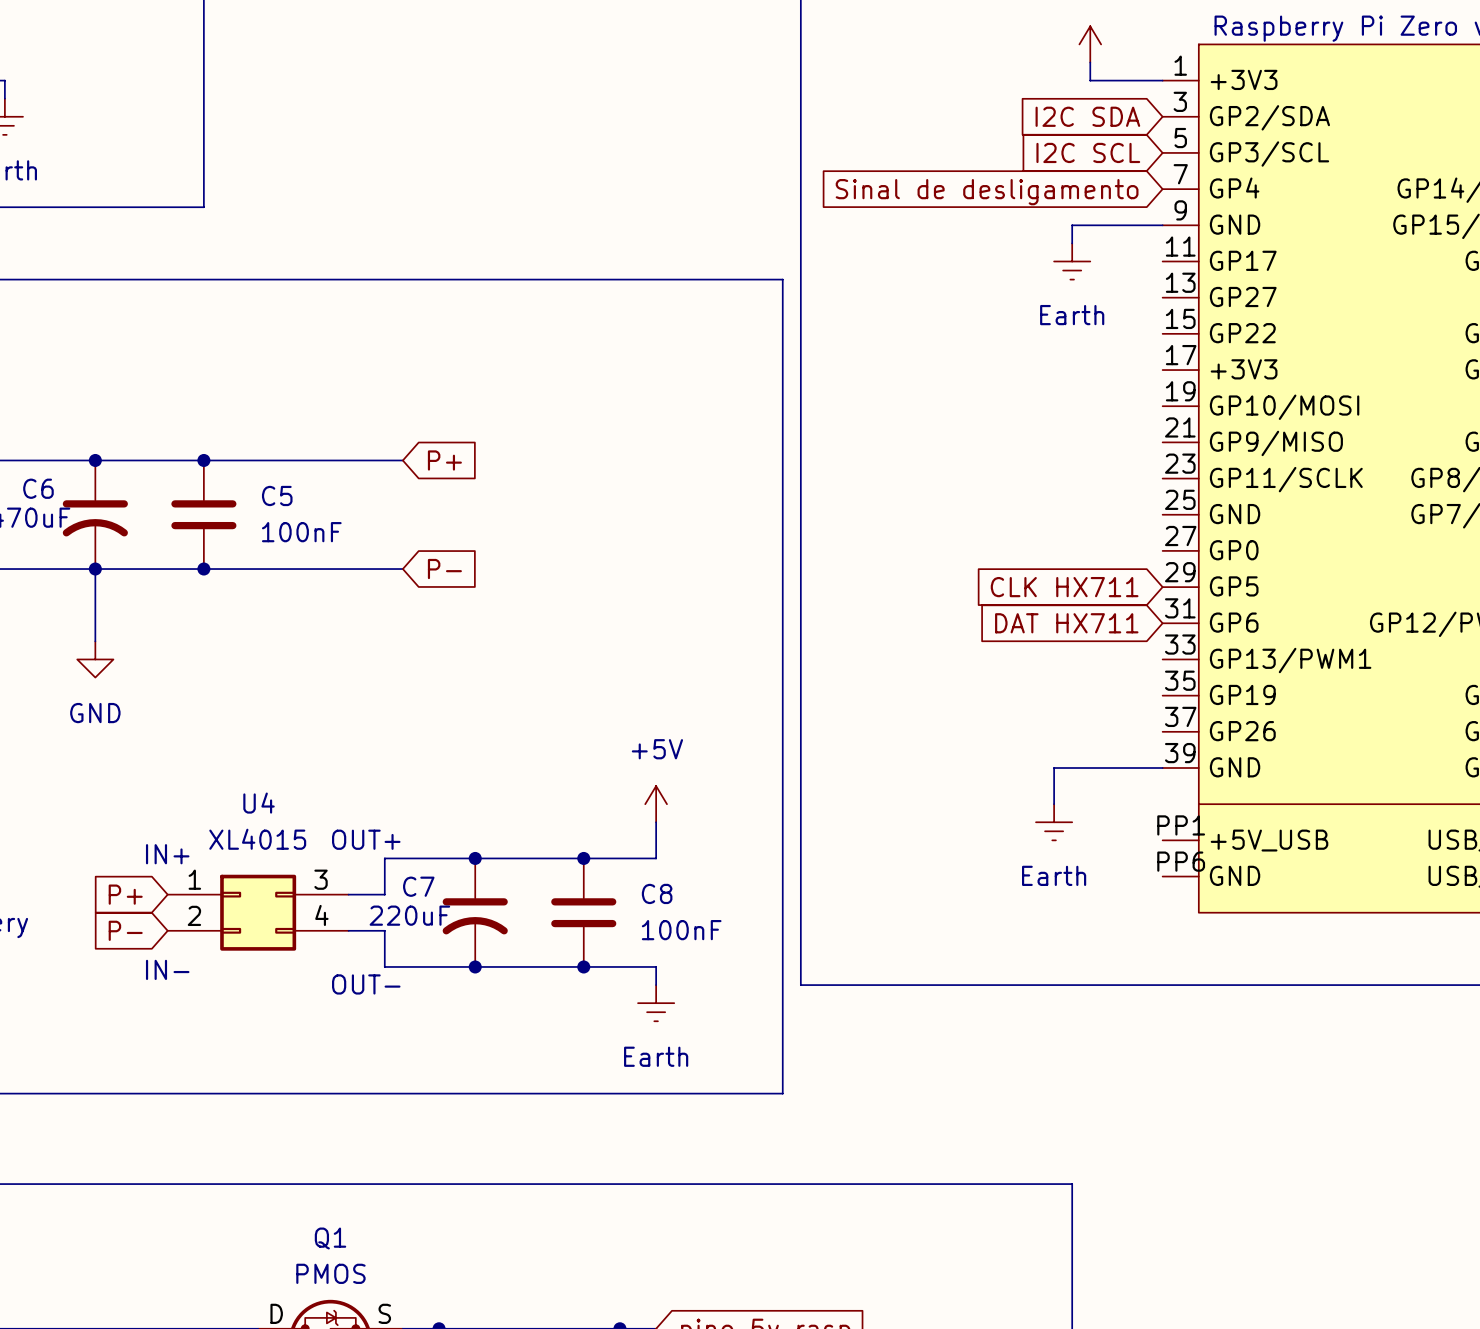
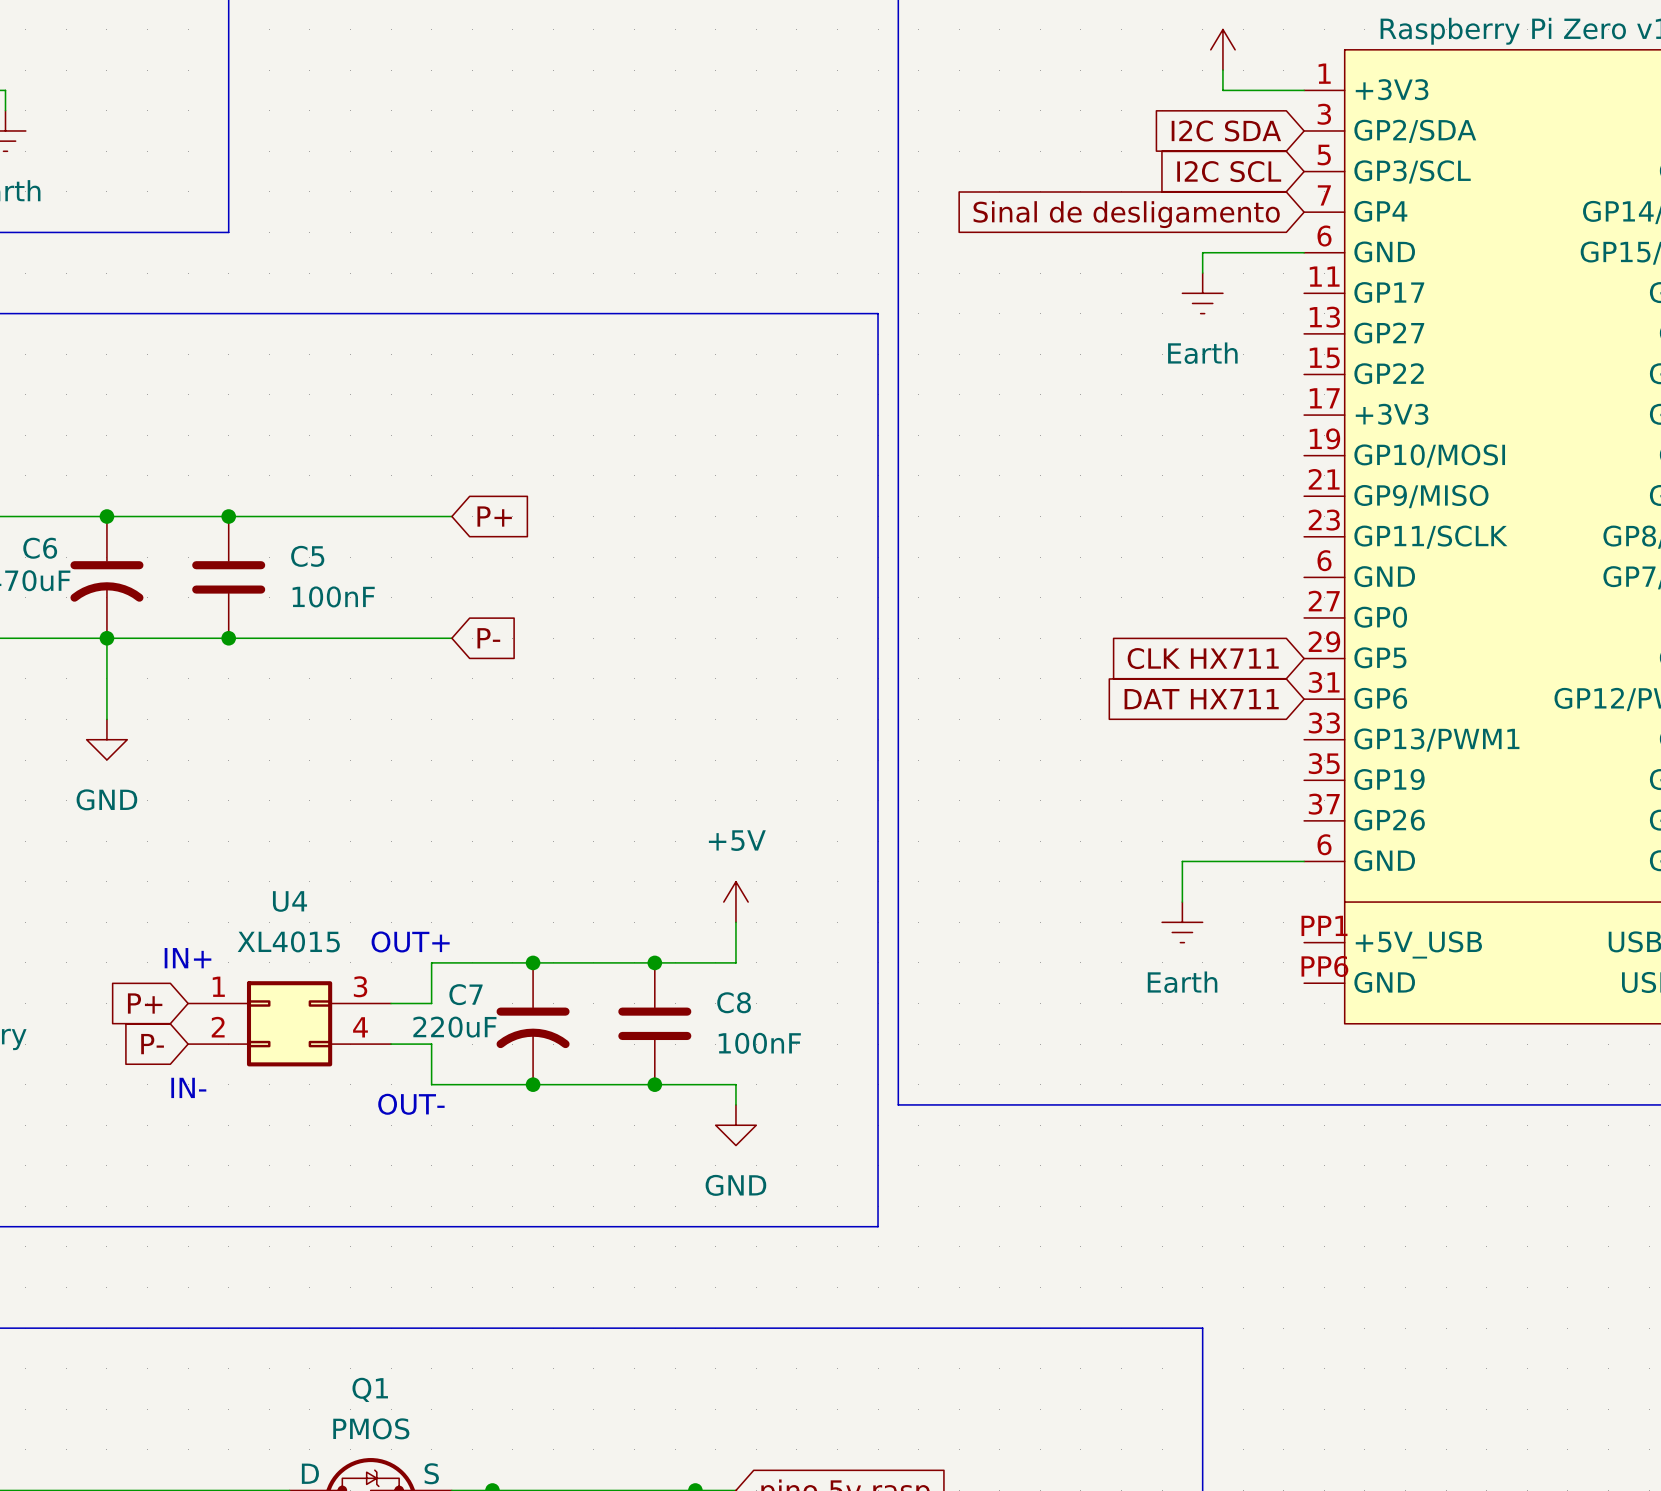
part pin number: 9 (1180, 210) -> 6 (1324, 236)
part pin number: 25 (1180, 499) -> 6 (1324, 560)
part pin number: 39 (1180, 753) -> 6 (1324, 844)
power symbol: Earth (656, 1003) -> GND (735, 1125)

